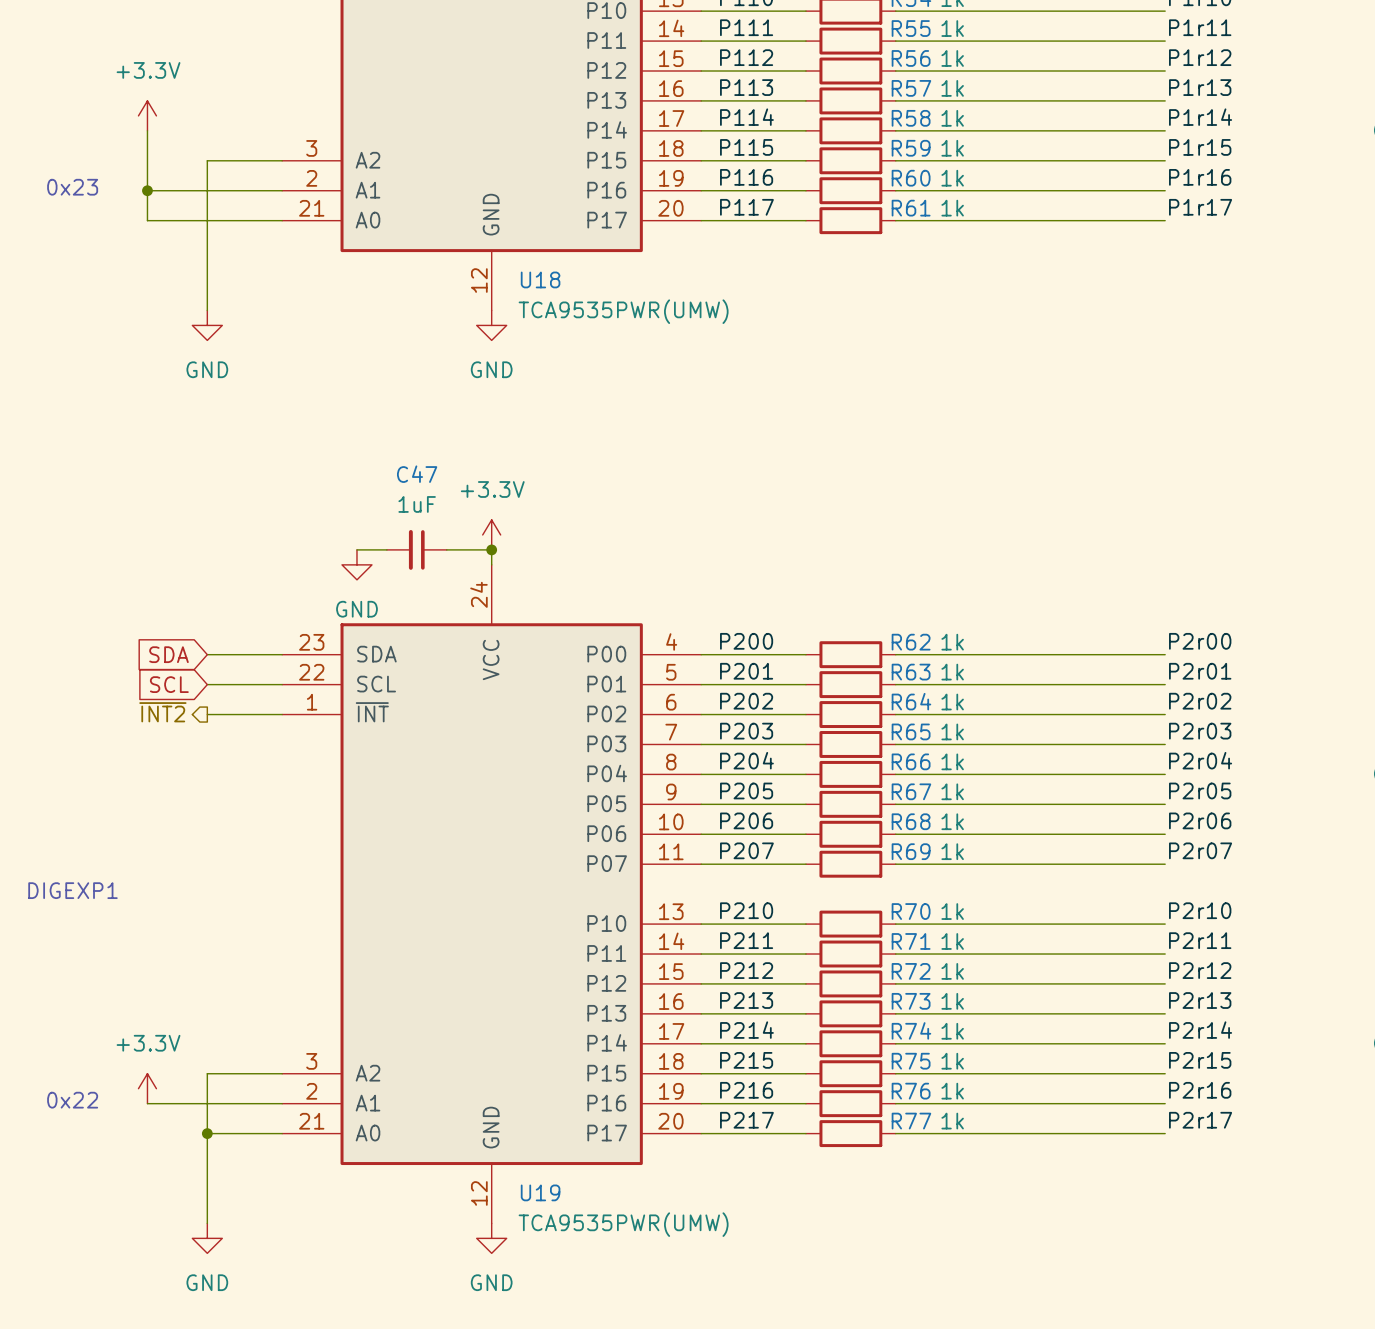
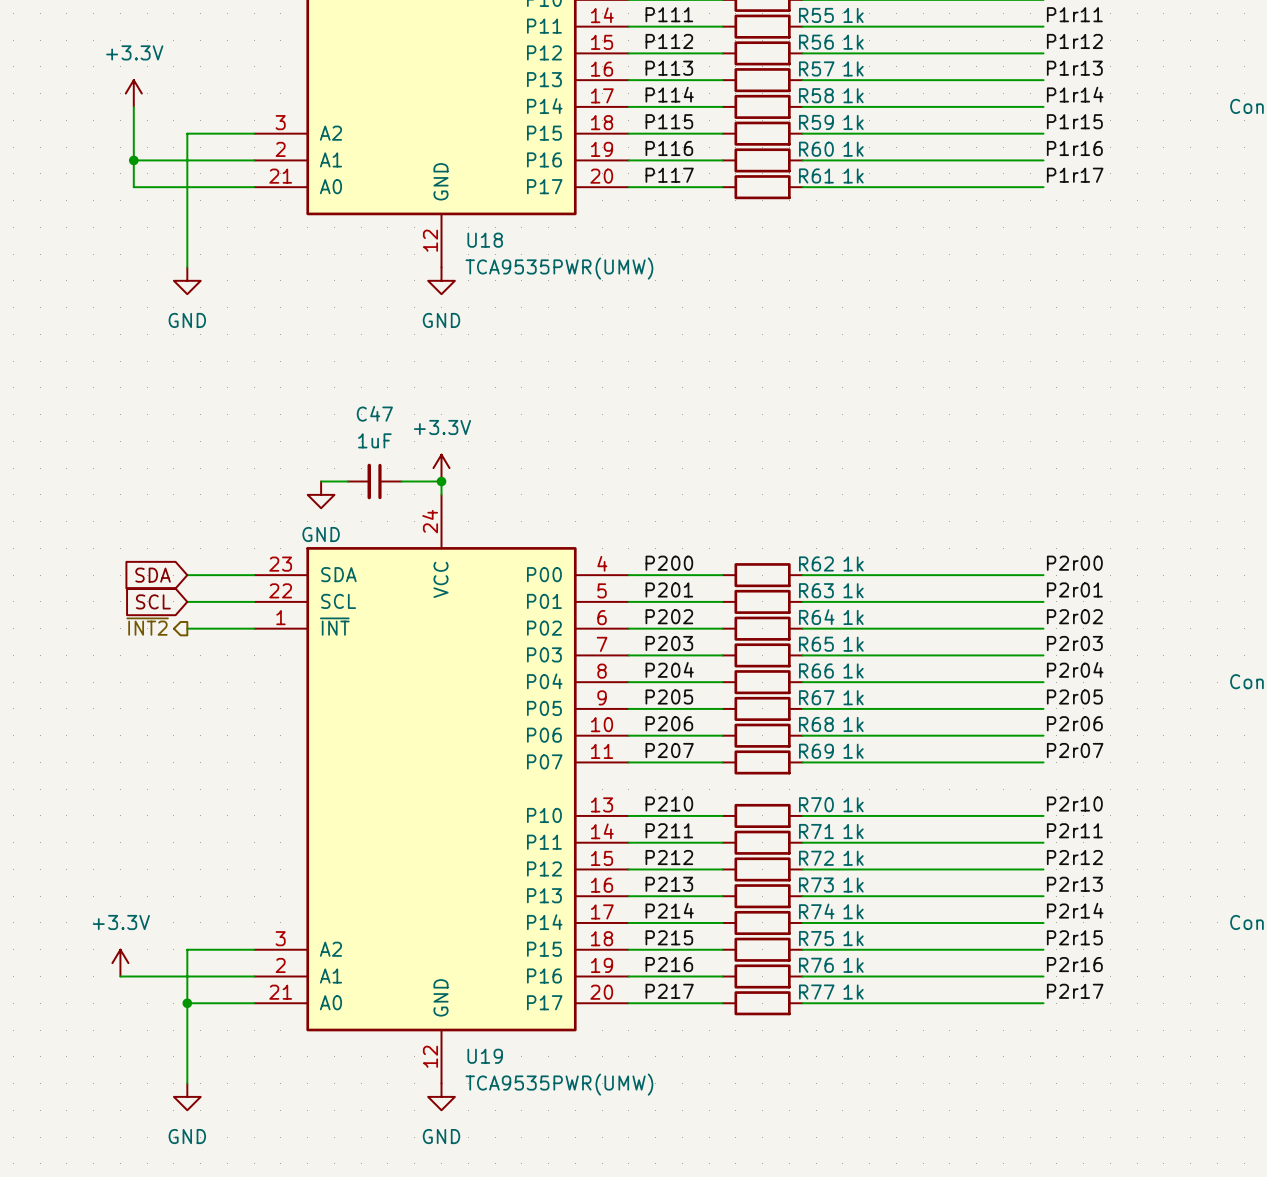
text: 0x23 (72, 187) -> none
text: DIGEXP1 (72, 890) -> none
power symbol position: +3.3V (147, 1088) -> +3.3V (120, 963)
text: 0x22 (72, 1100) -> none
wire: none -> (120, 976) (133, 976)

